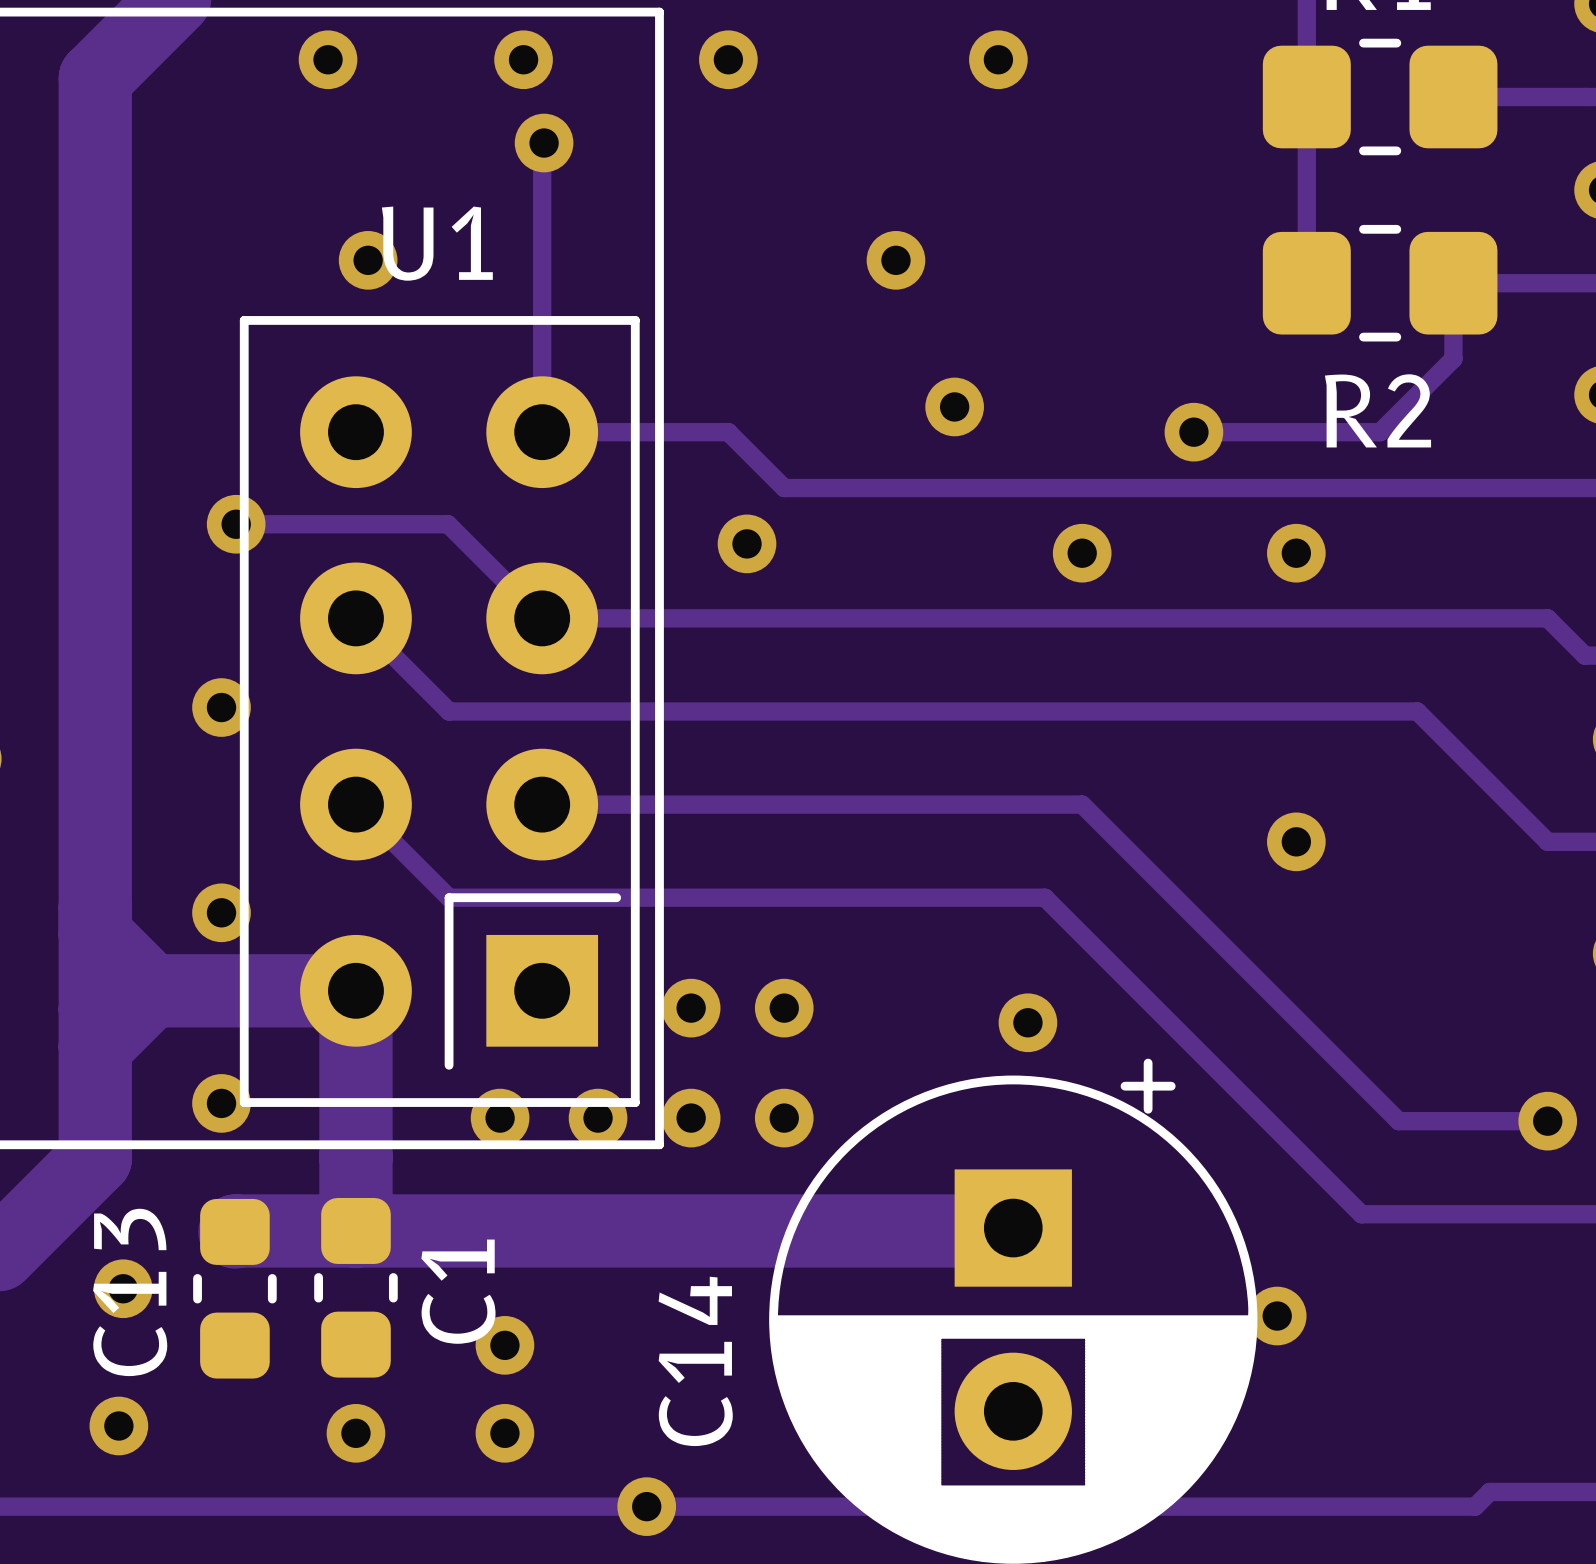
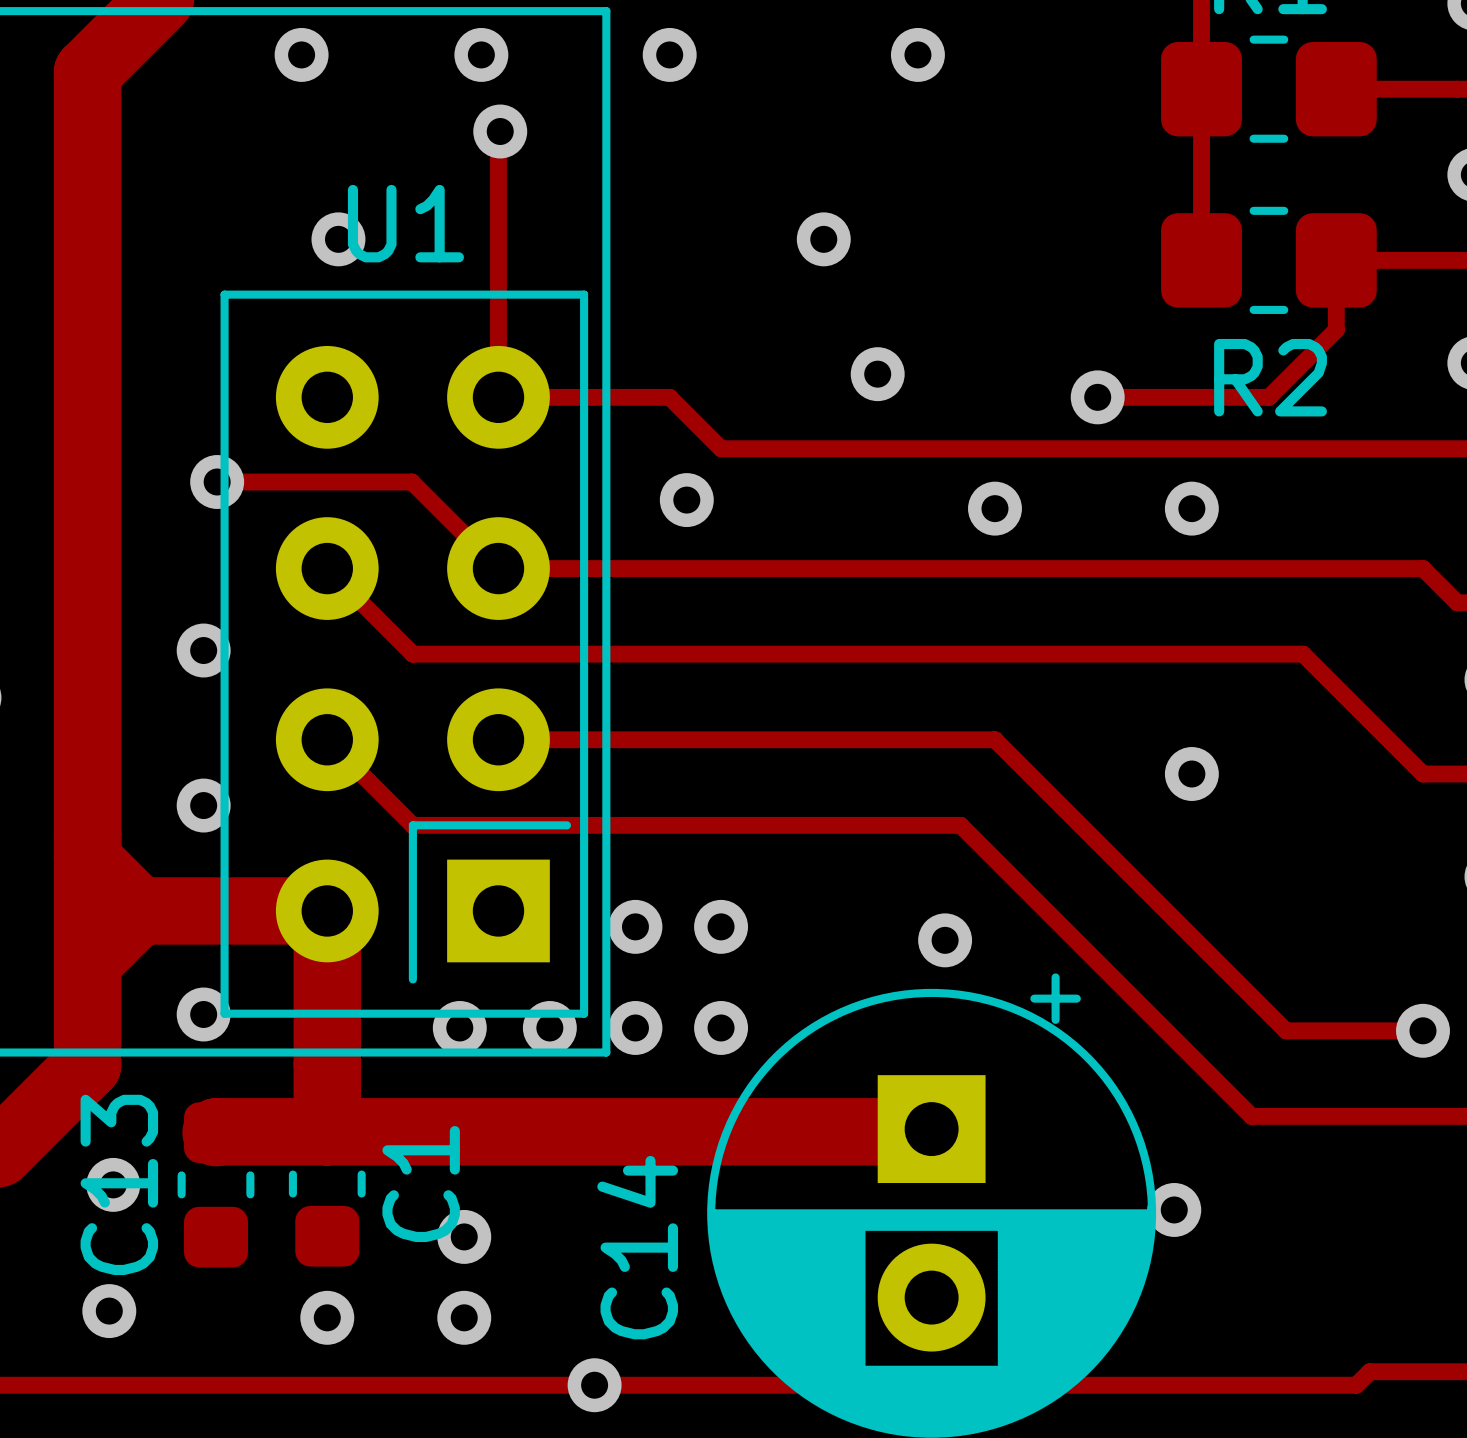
via position: (221, 912) -> (203, 805)

